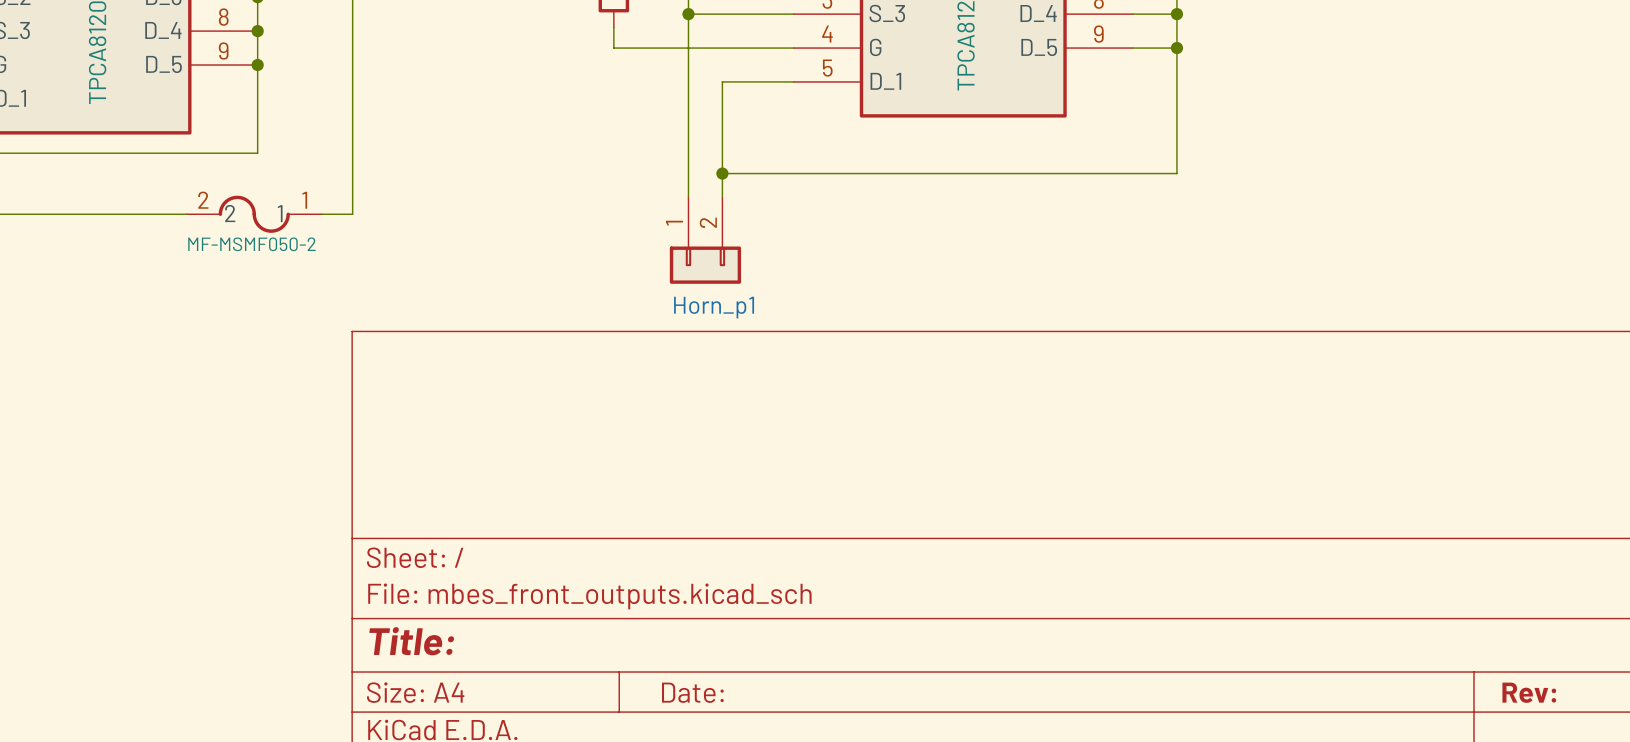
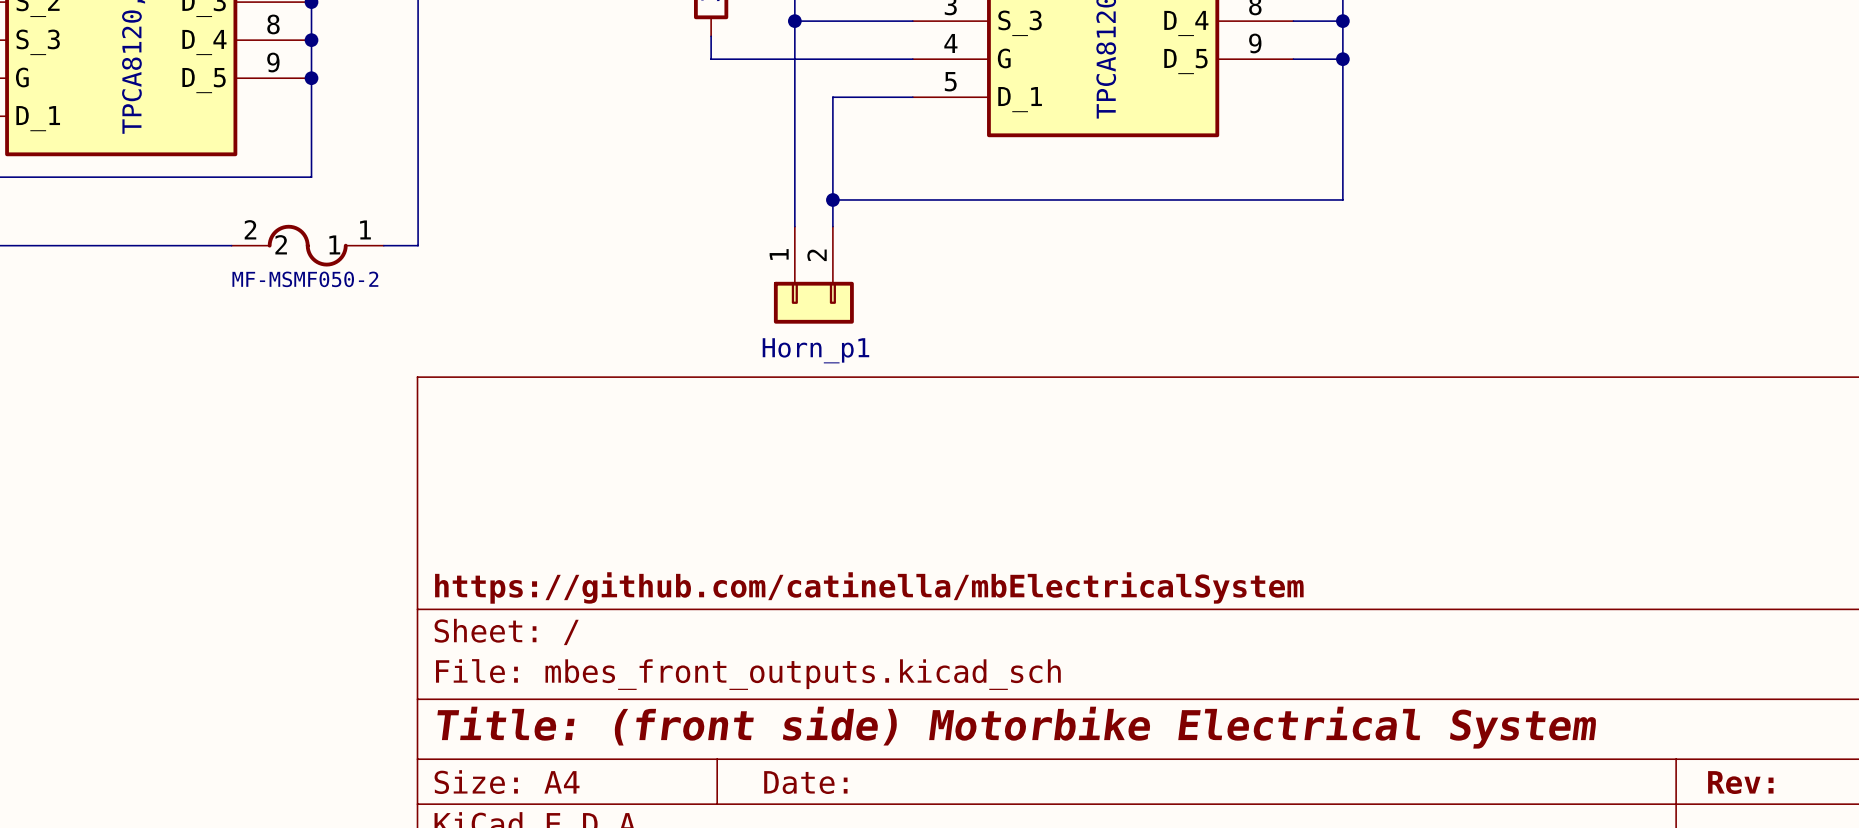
title block: none -> https://github.com/catinella/mbElectricalSystem (869, 587)
title block: Title: (411, 641) -> Title: (front side) Motorbike Electrical System (1016, 727)

